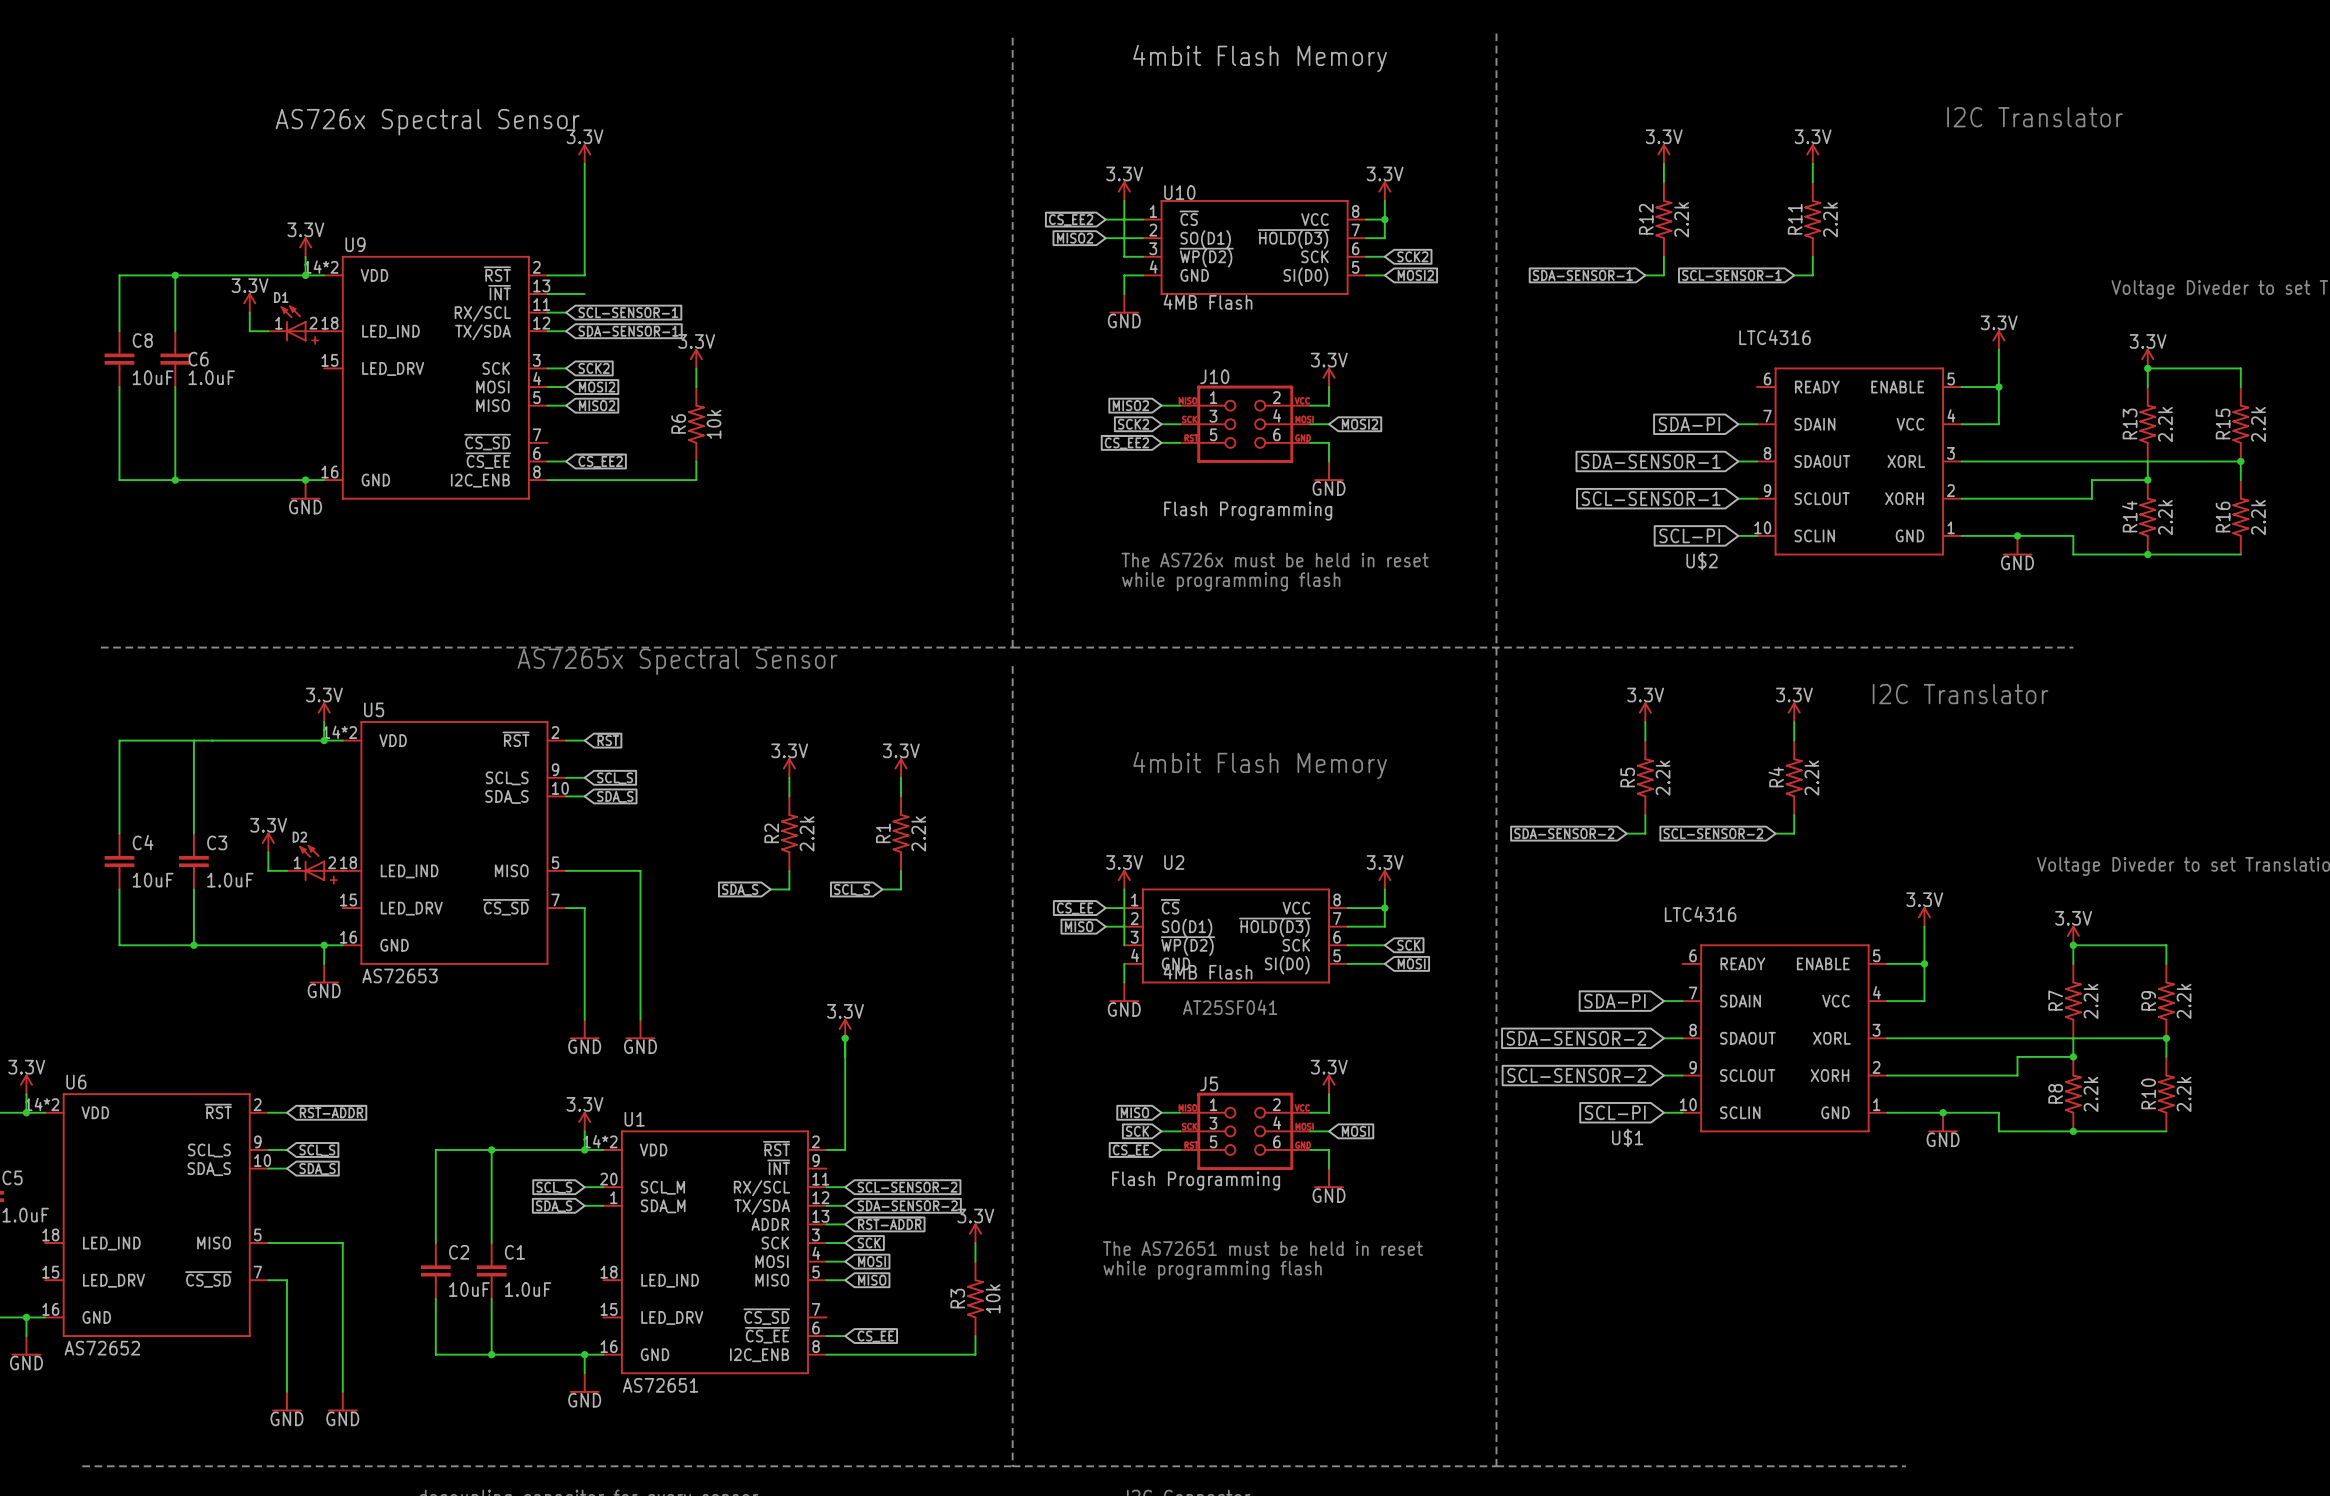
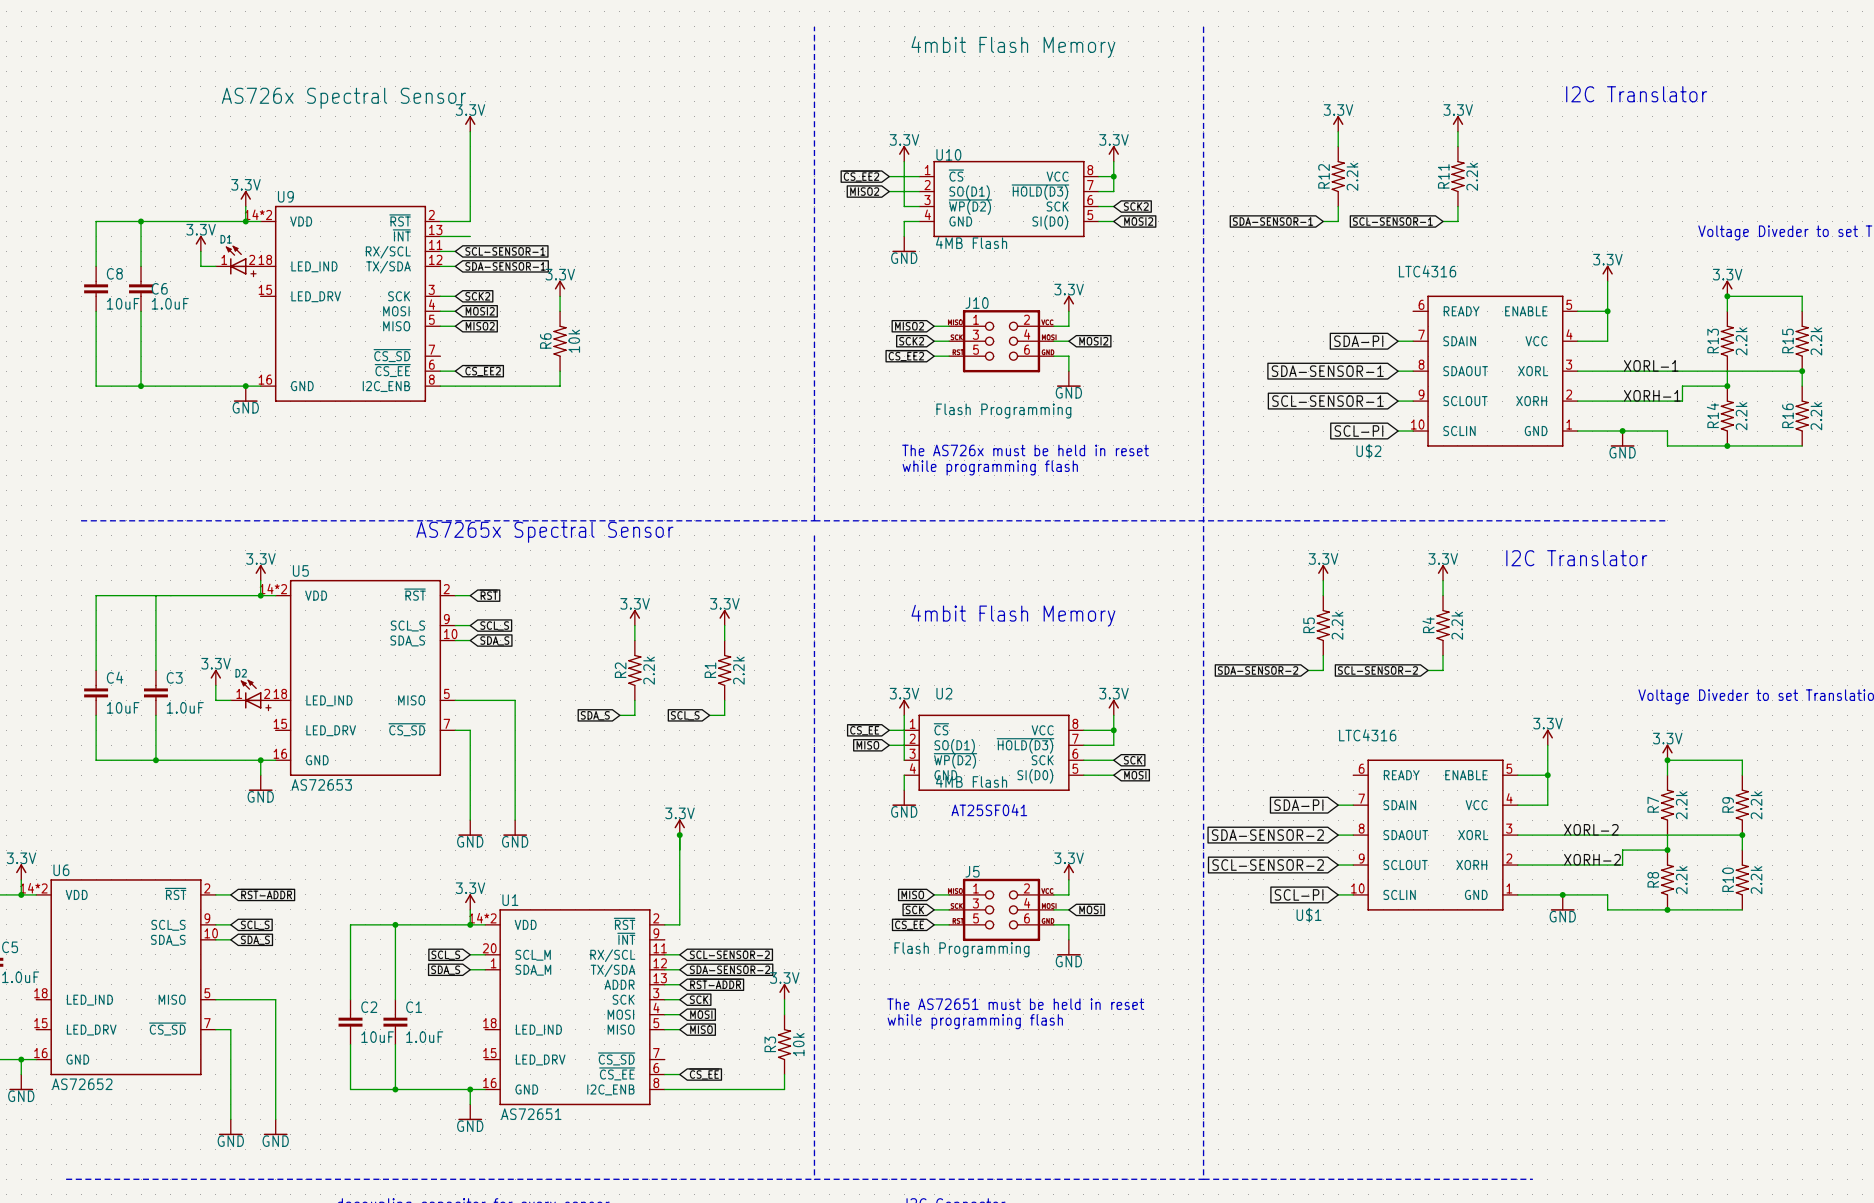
label: none -> XORL-1 (1651, 365)
label: none -> XORH-1 (1652, 395)
label: none -> XORL-2 (1591, 829)
label: none -> XORH-2 (1592, 859)

